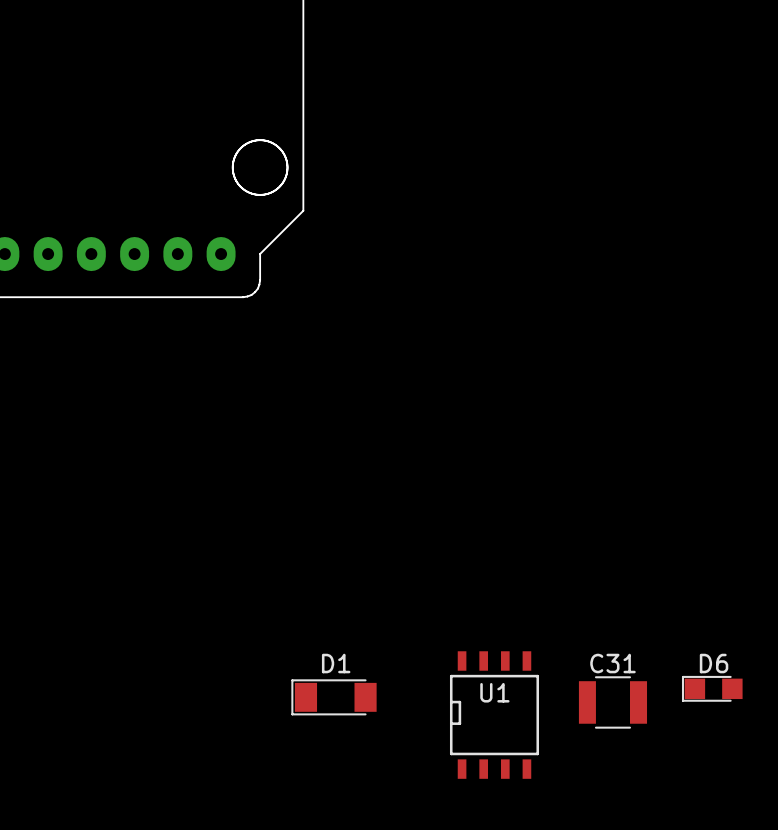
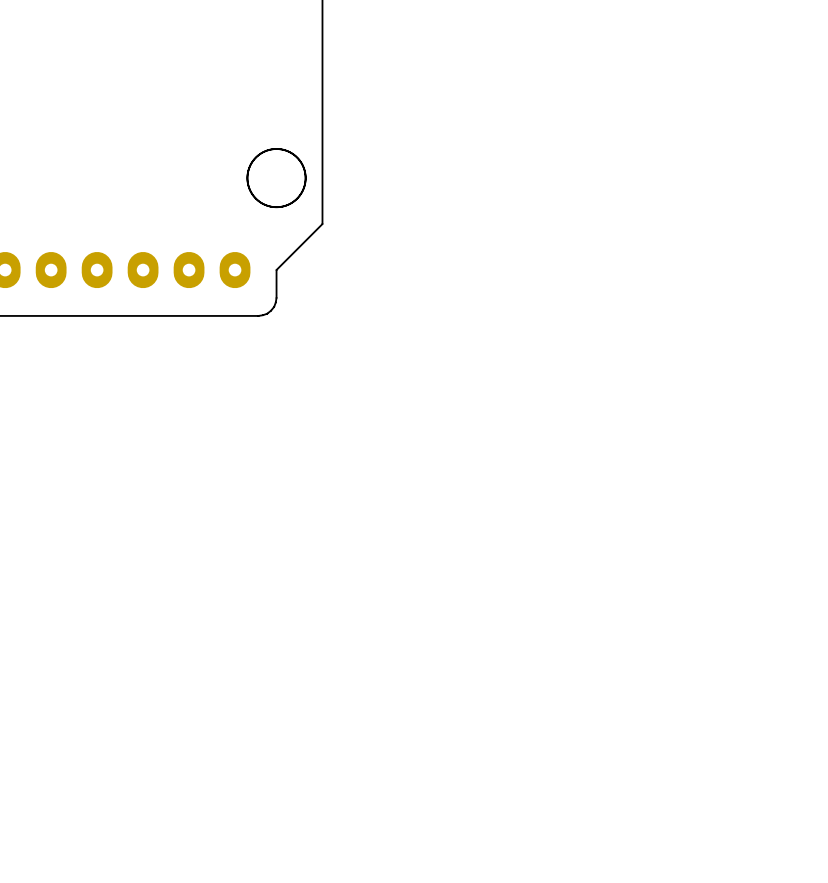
D6: (712, 688) -> none
D1: (333, 697) -> none
C31: (612, 702) -> none
U1: (494, 715) -> none

